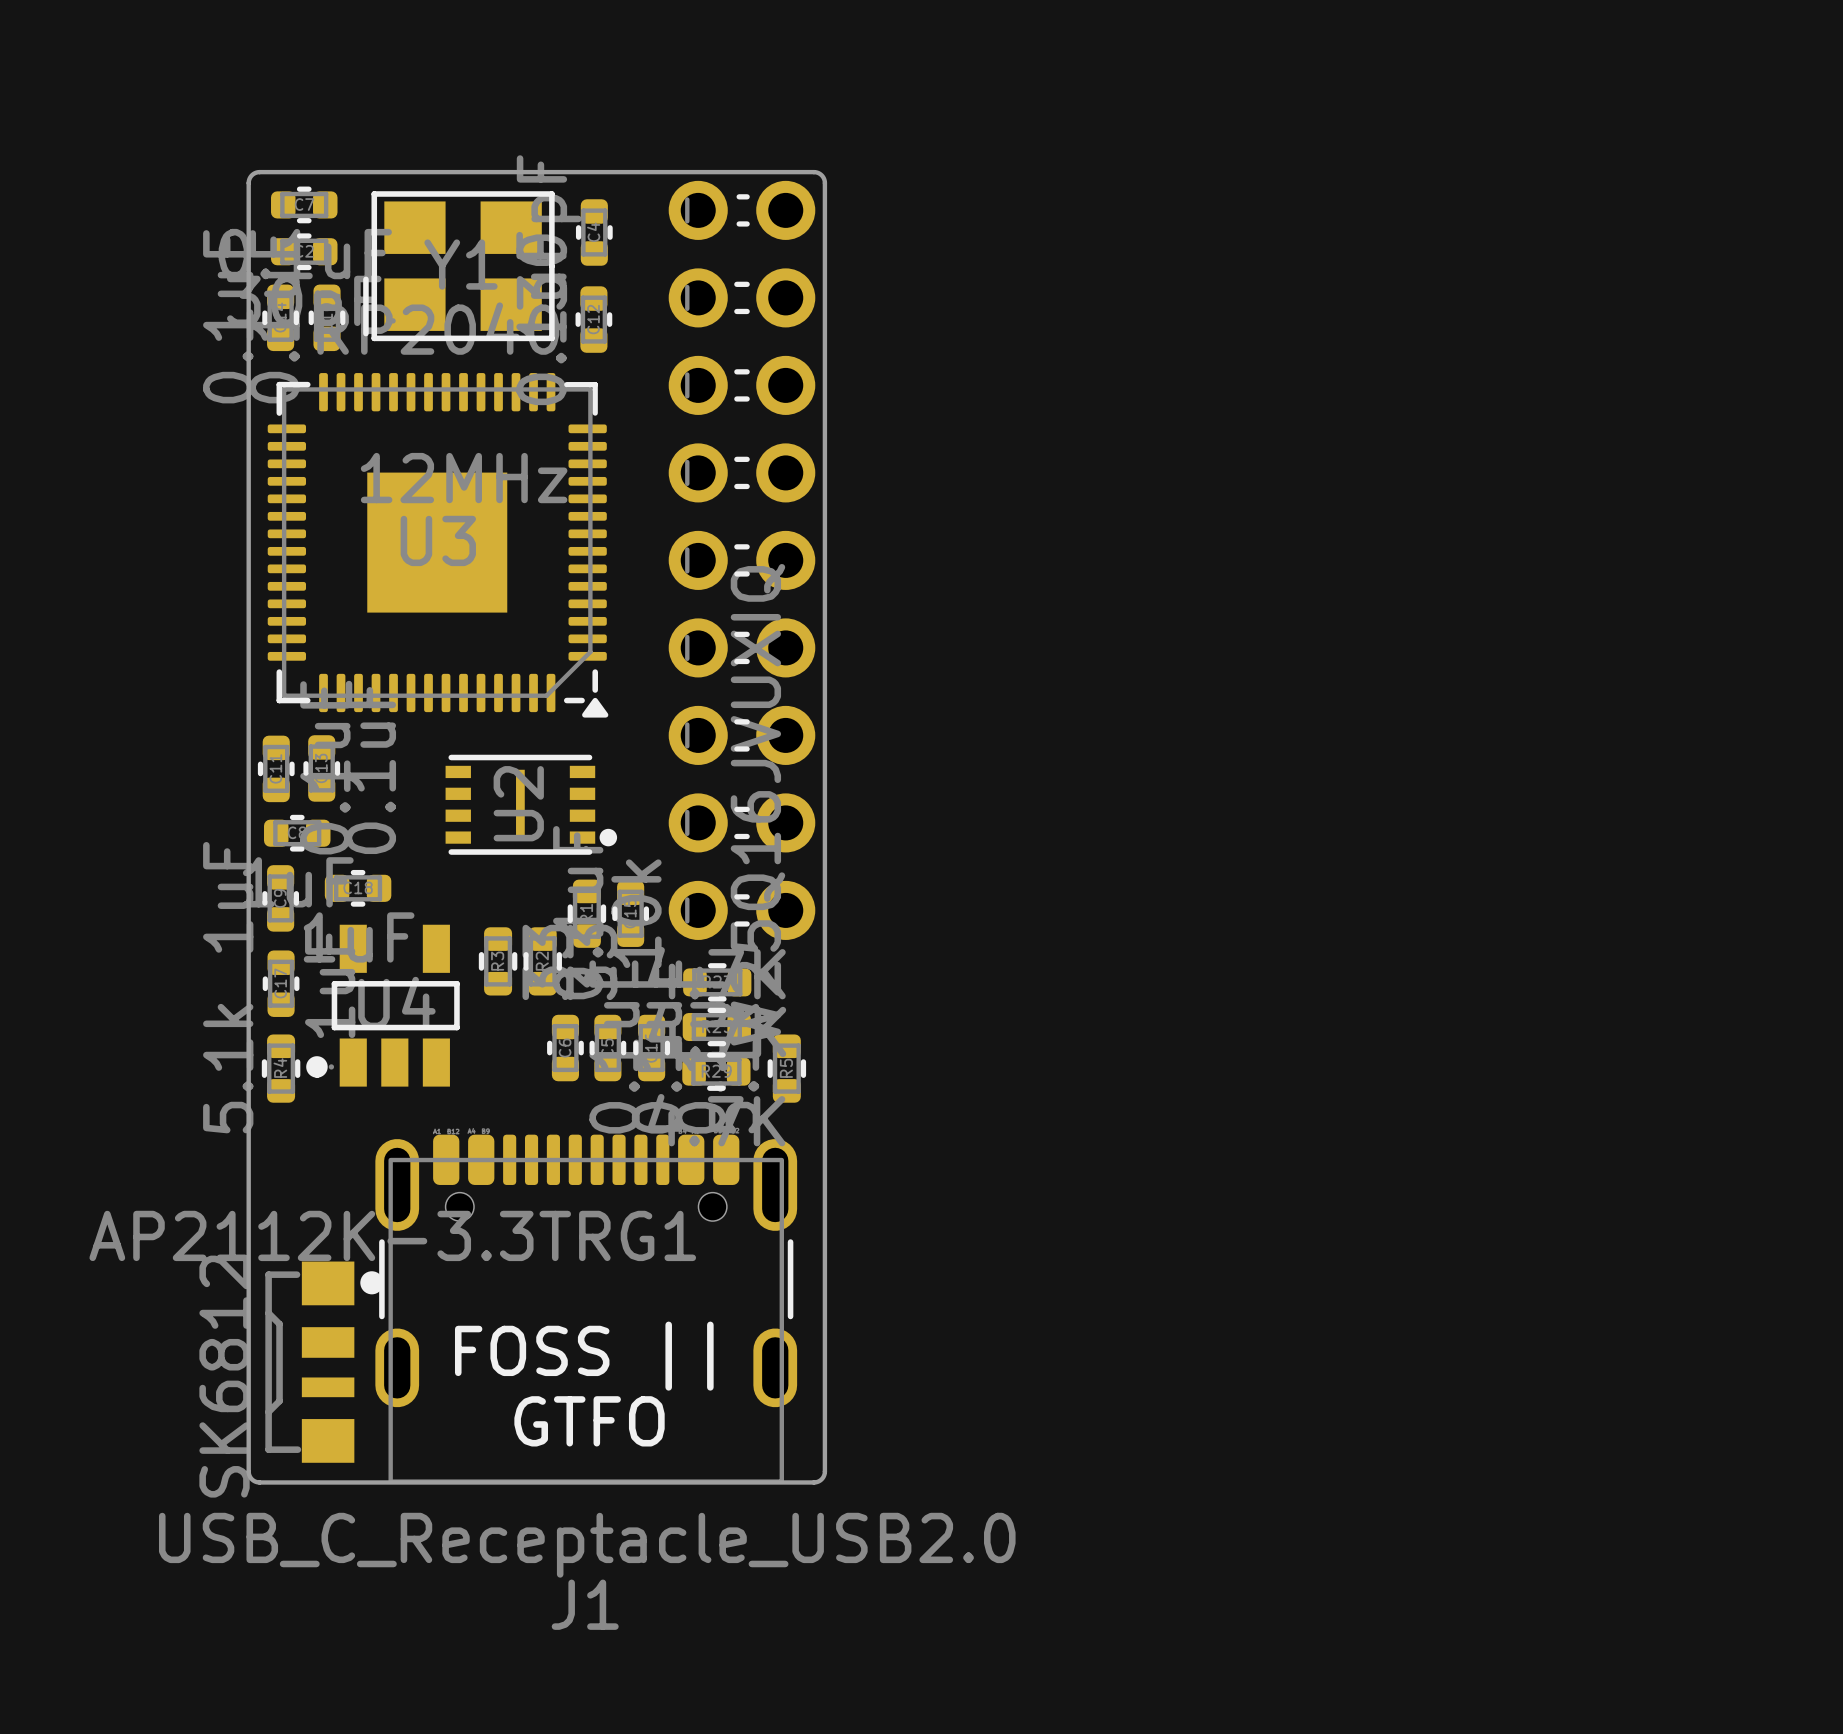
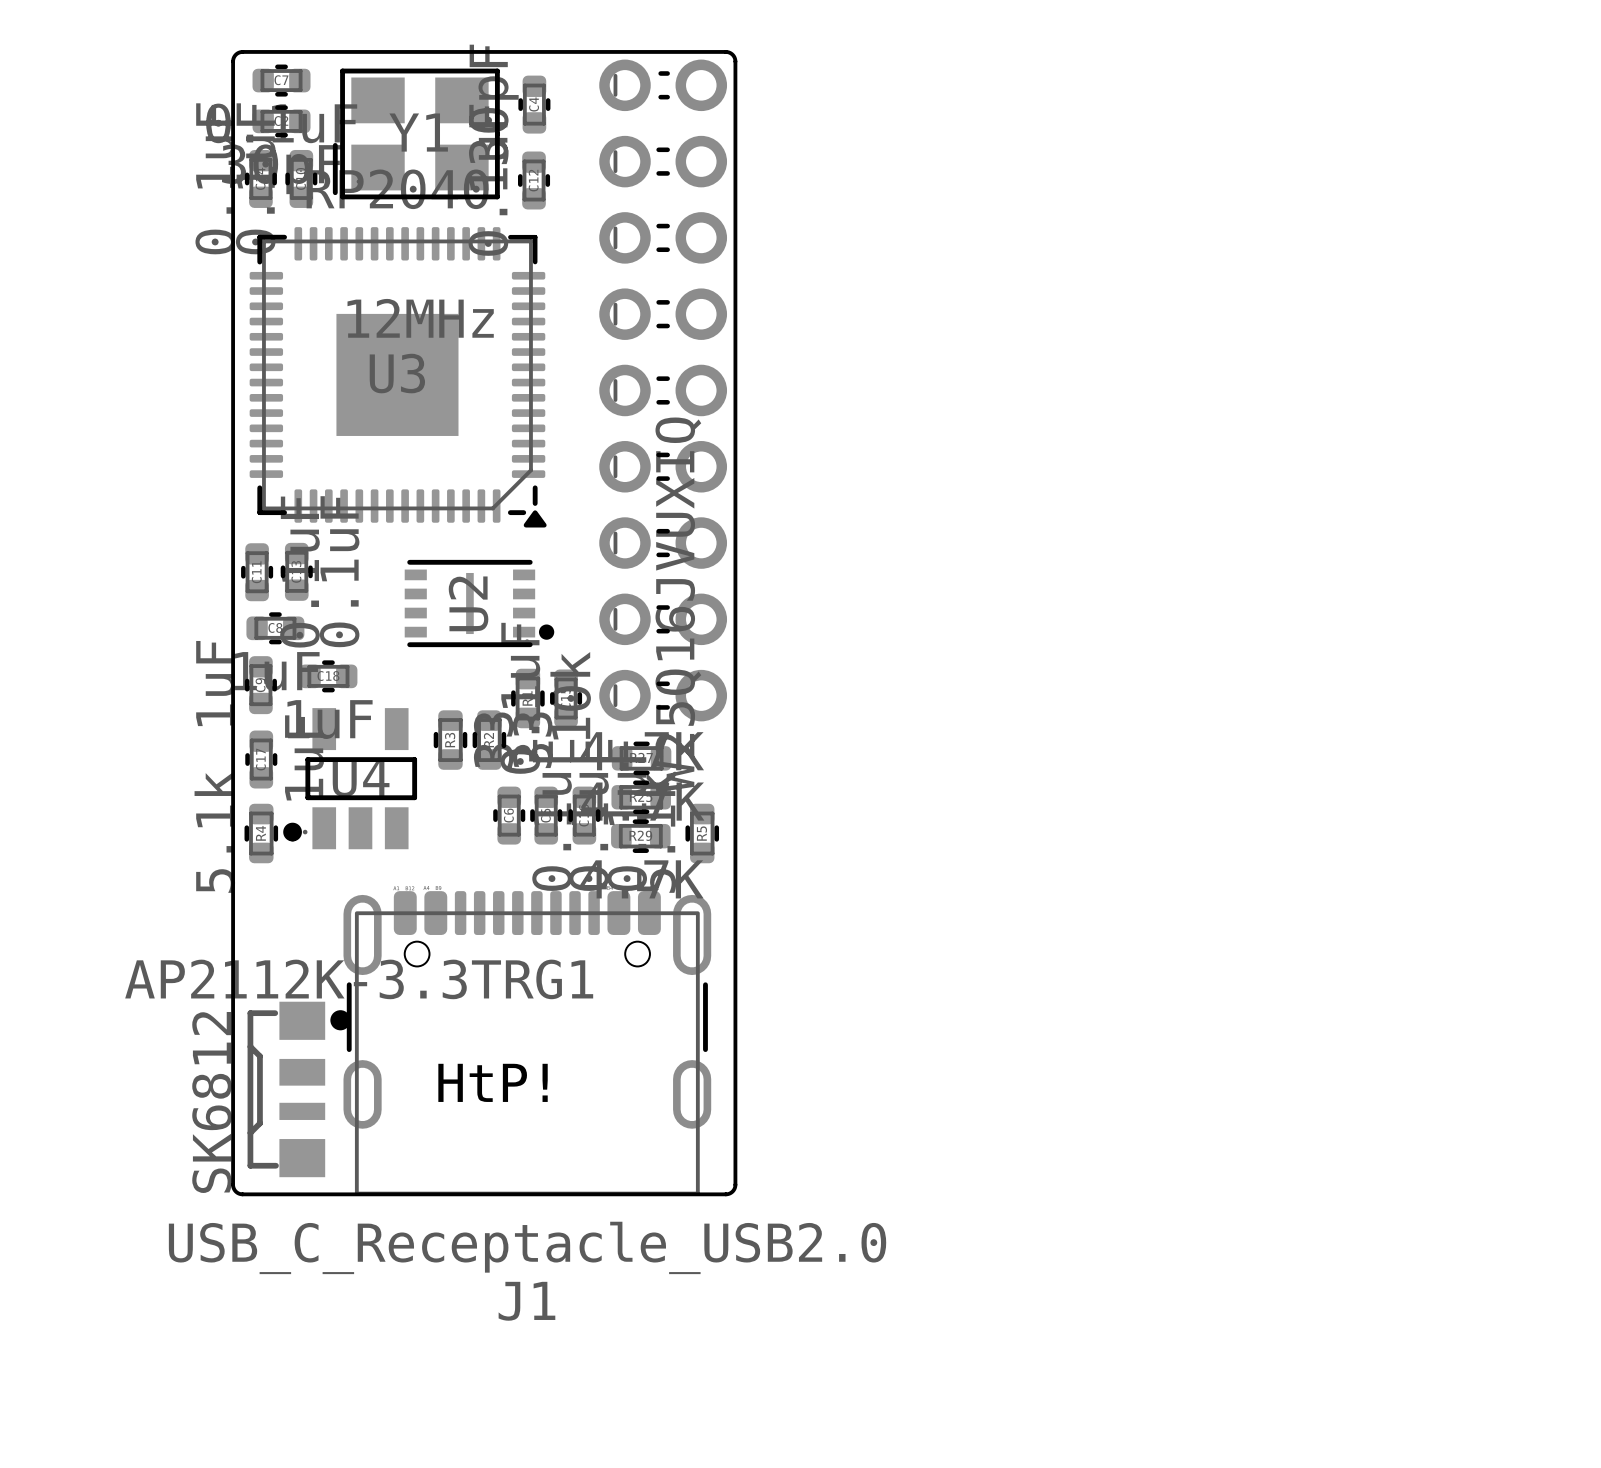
text: none -> HtP! (493, 1082)
text: FOSS || (584, 1356) -> none
text: GTFO (589, 1421) -> none

